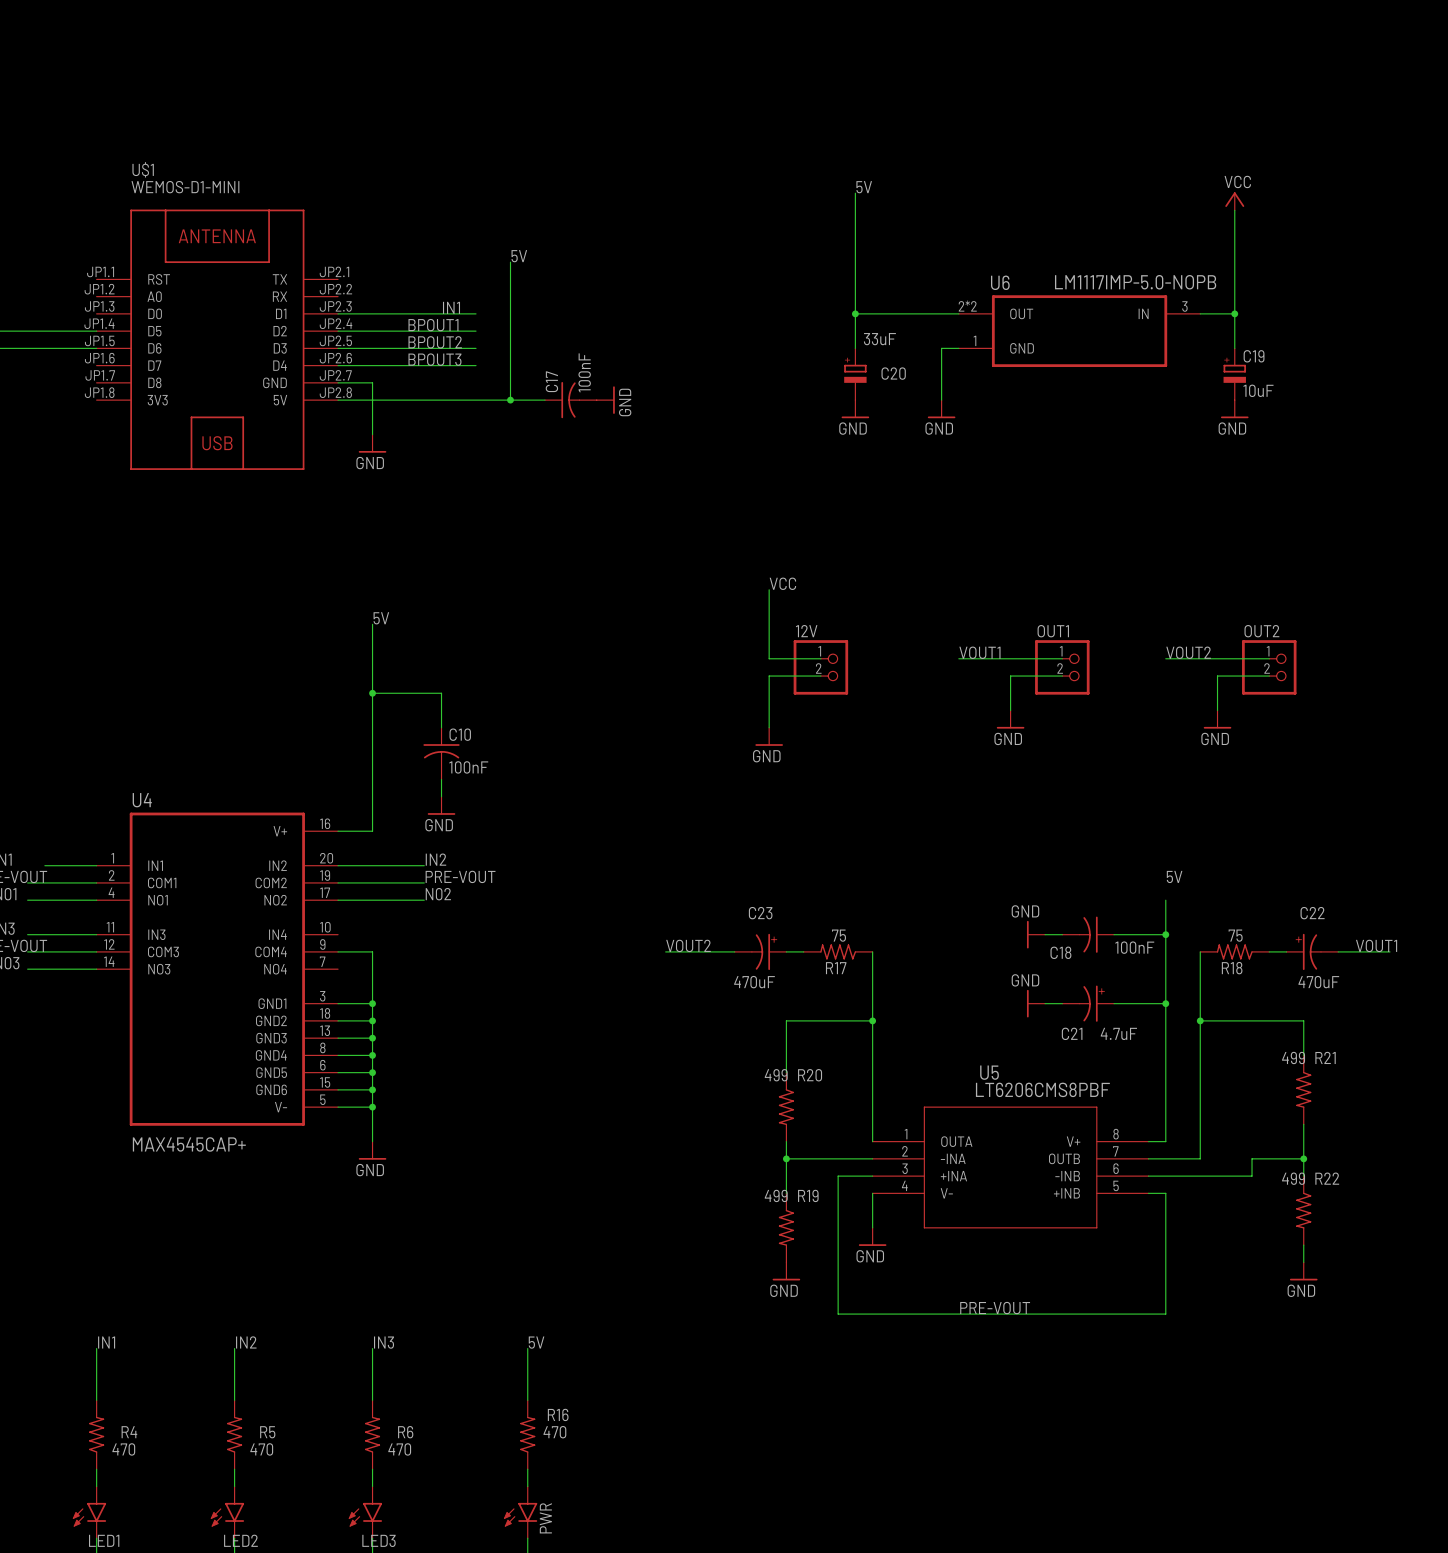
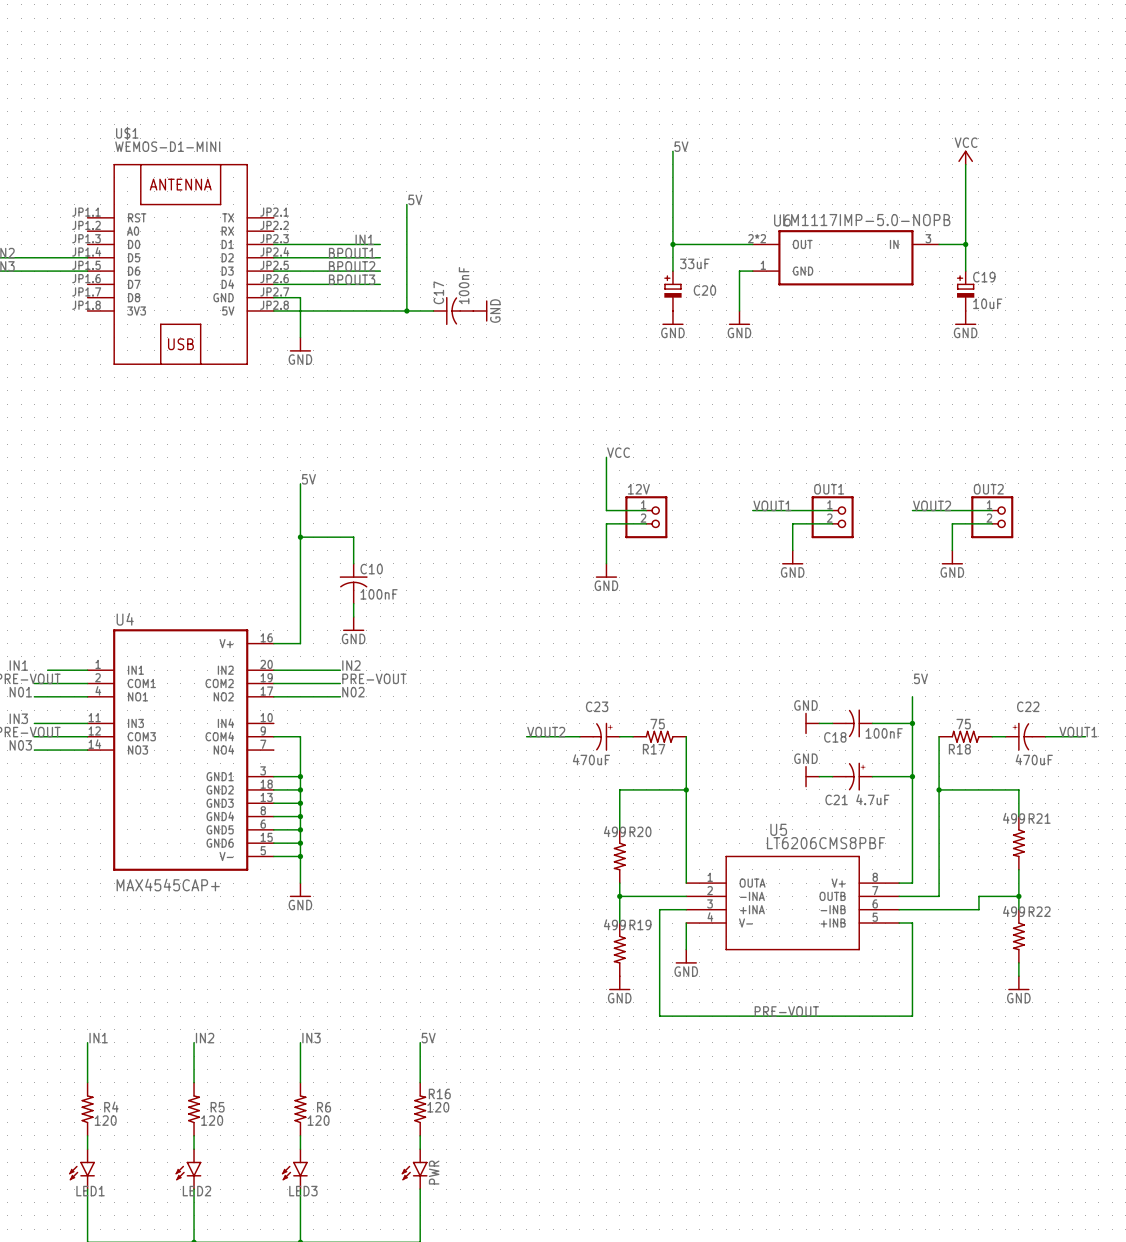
R16 value: 470 (554, 1432) -> 120 (438, 1107)
R4 value: 470 (123, 1449) -> 120 (105, 1120)
R5 value: 470 (261, 1449) -> 120 (212, 1120)
R6 value: 470 (399, 1449) -> 120 (318, 1120)

